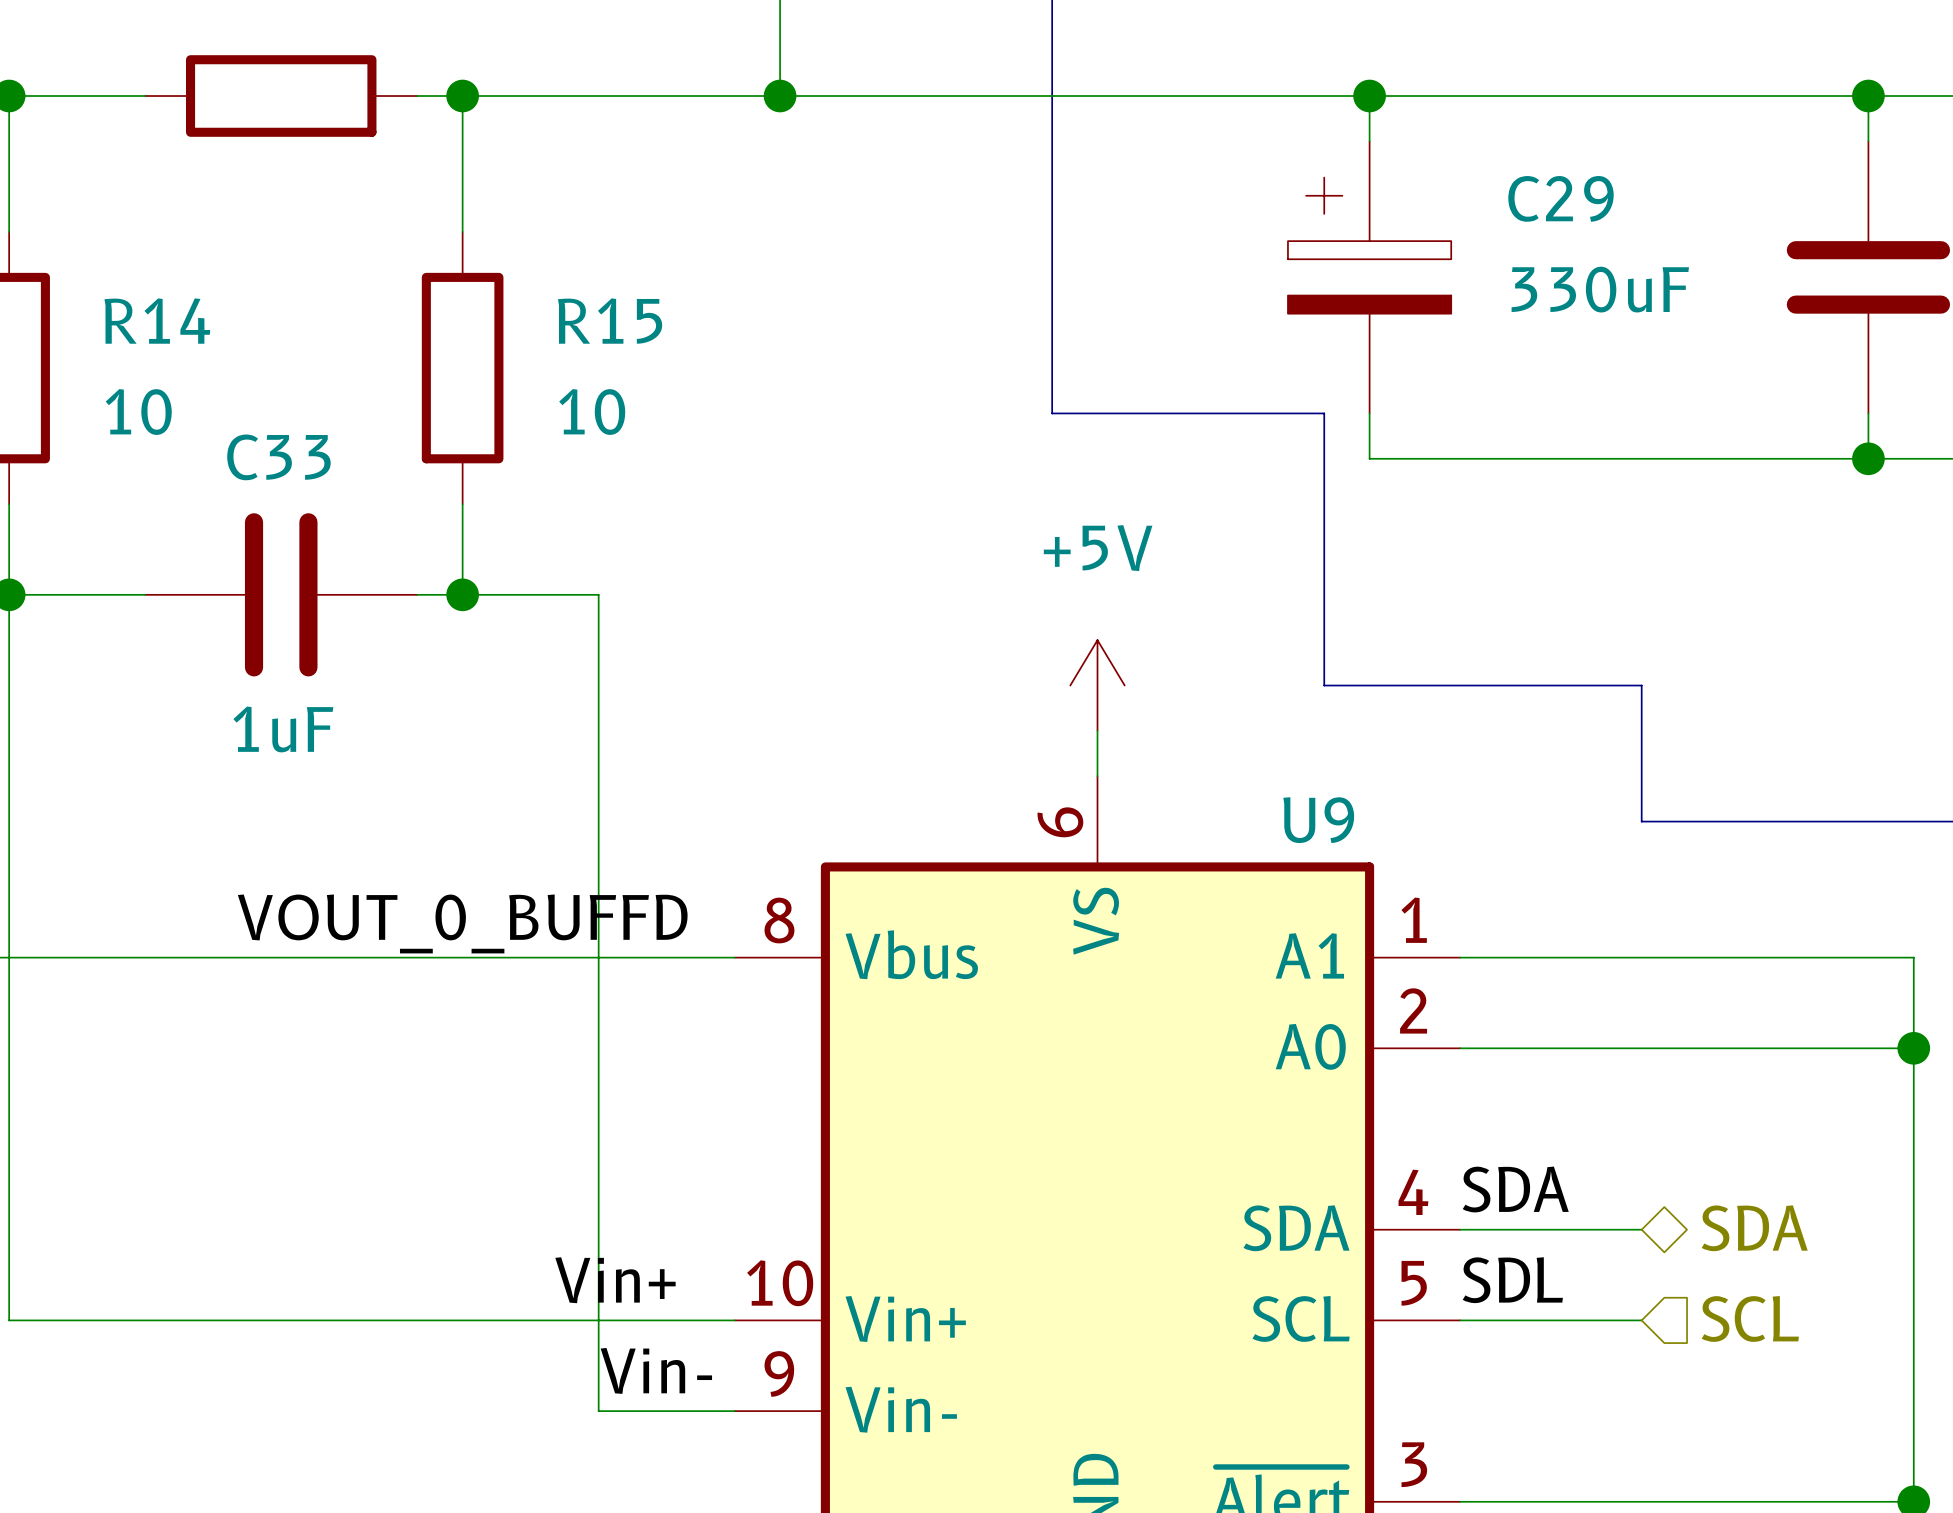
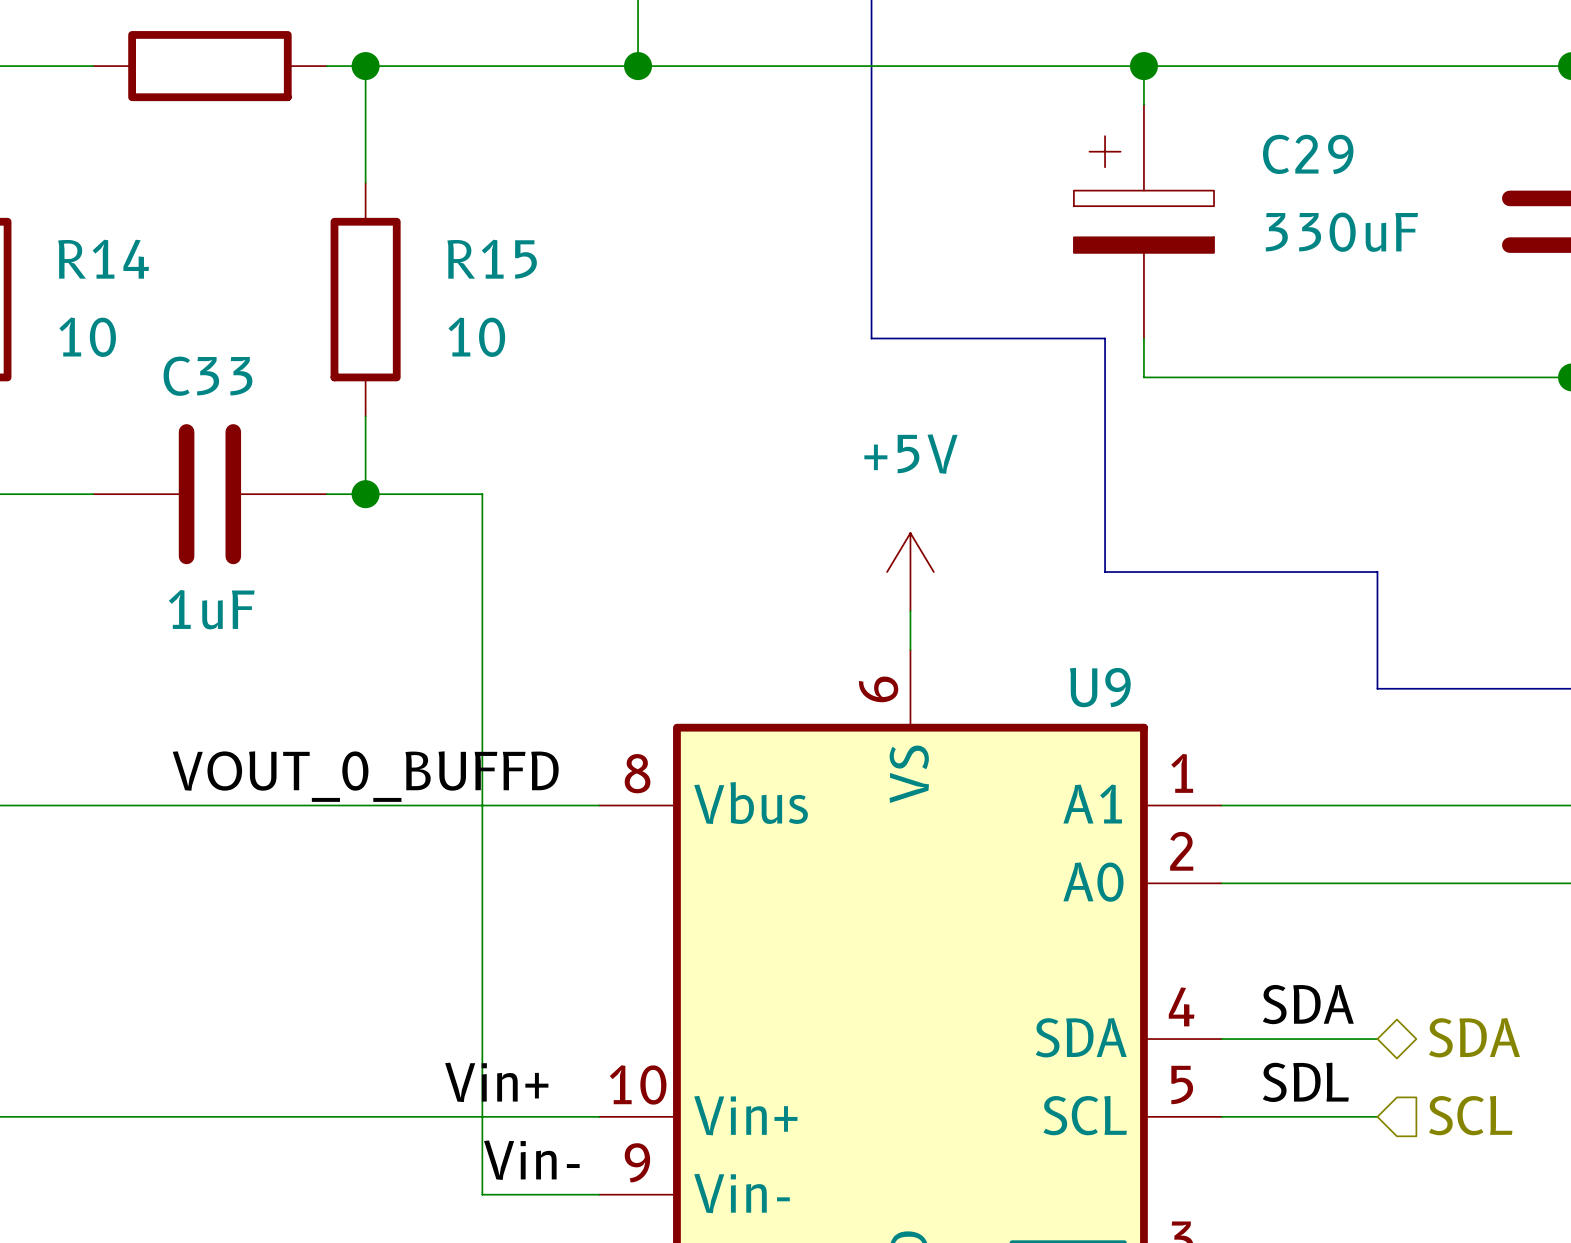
label position: SDA (1515, 1189) -> SDA (1308, 1004)
label position: SDL (1512, 1280) -> SDL (1305, 1082)

